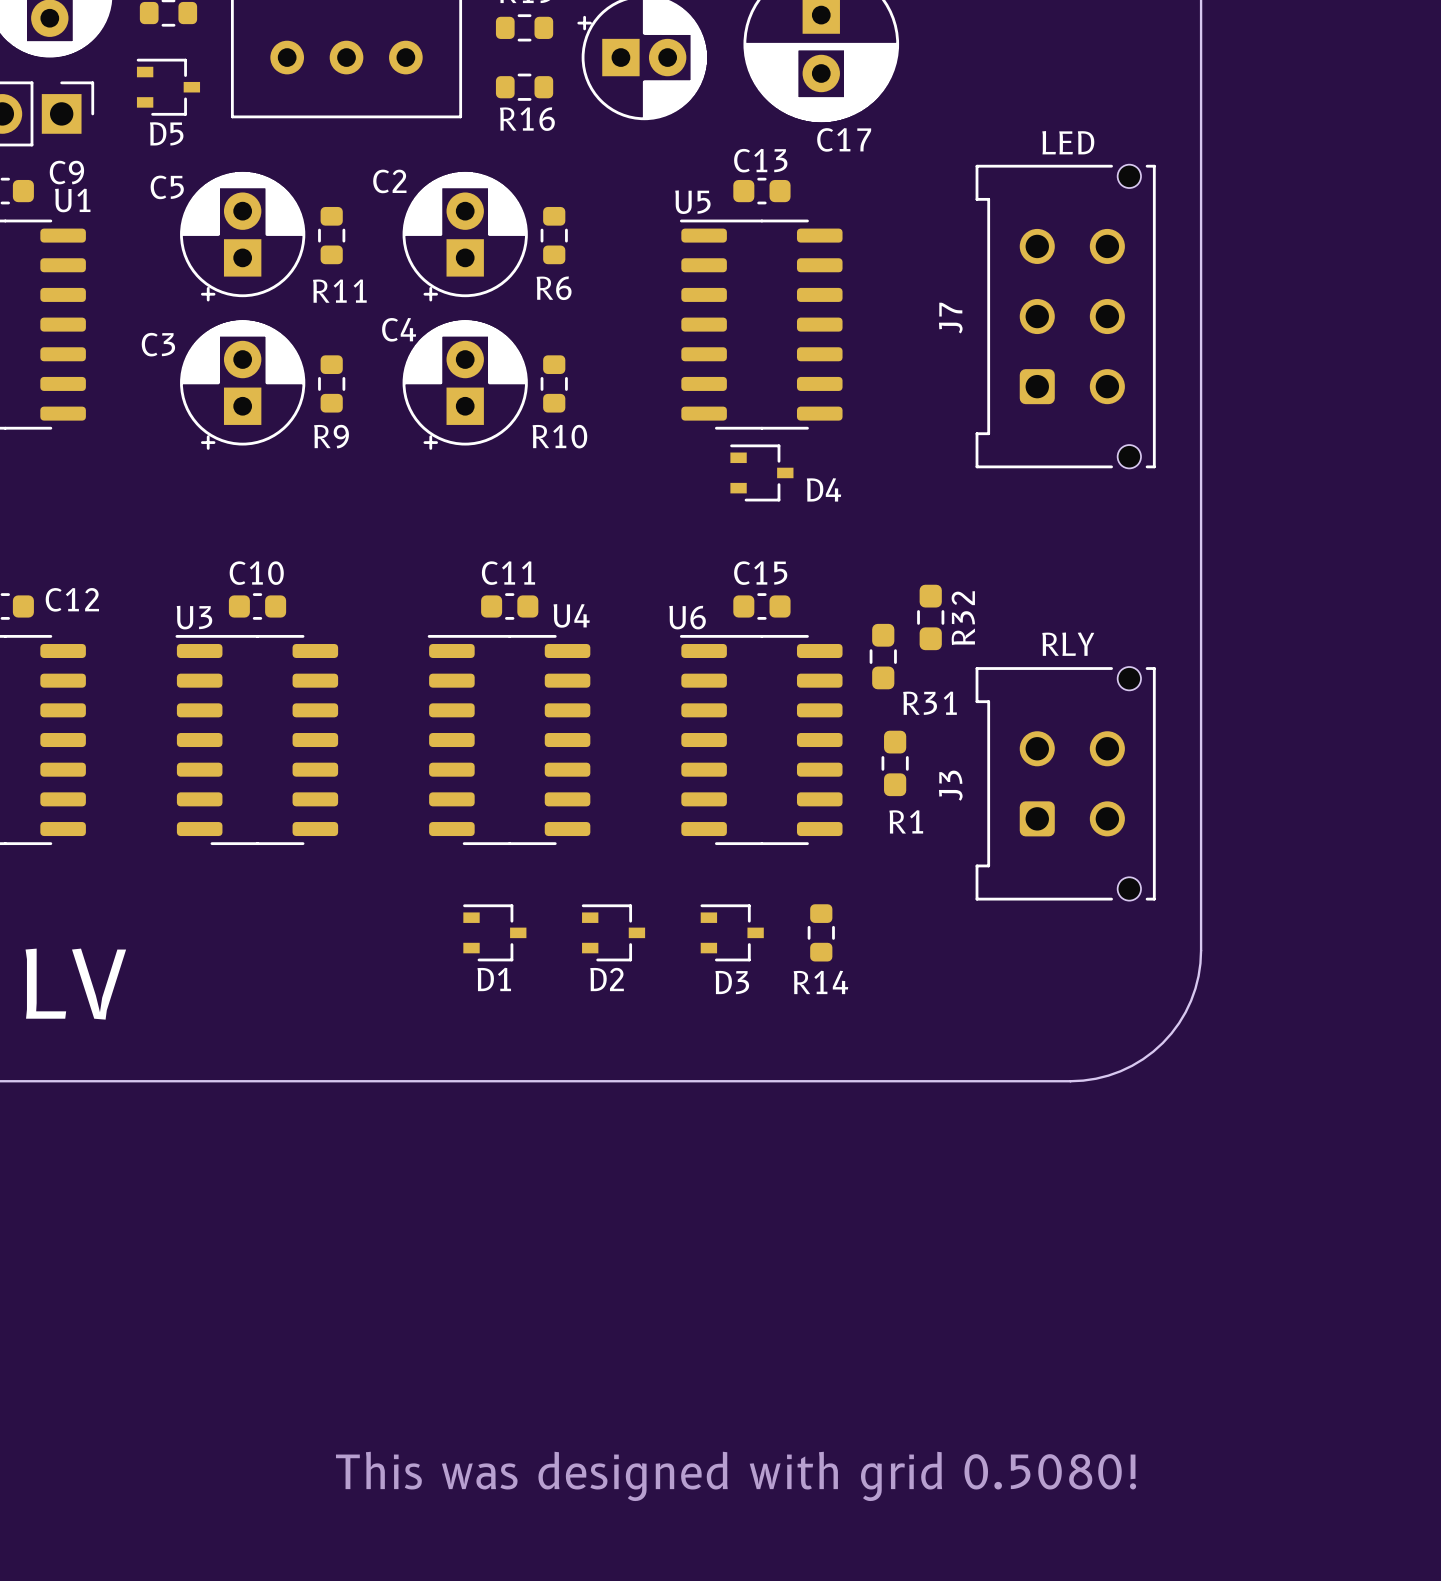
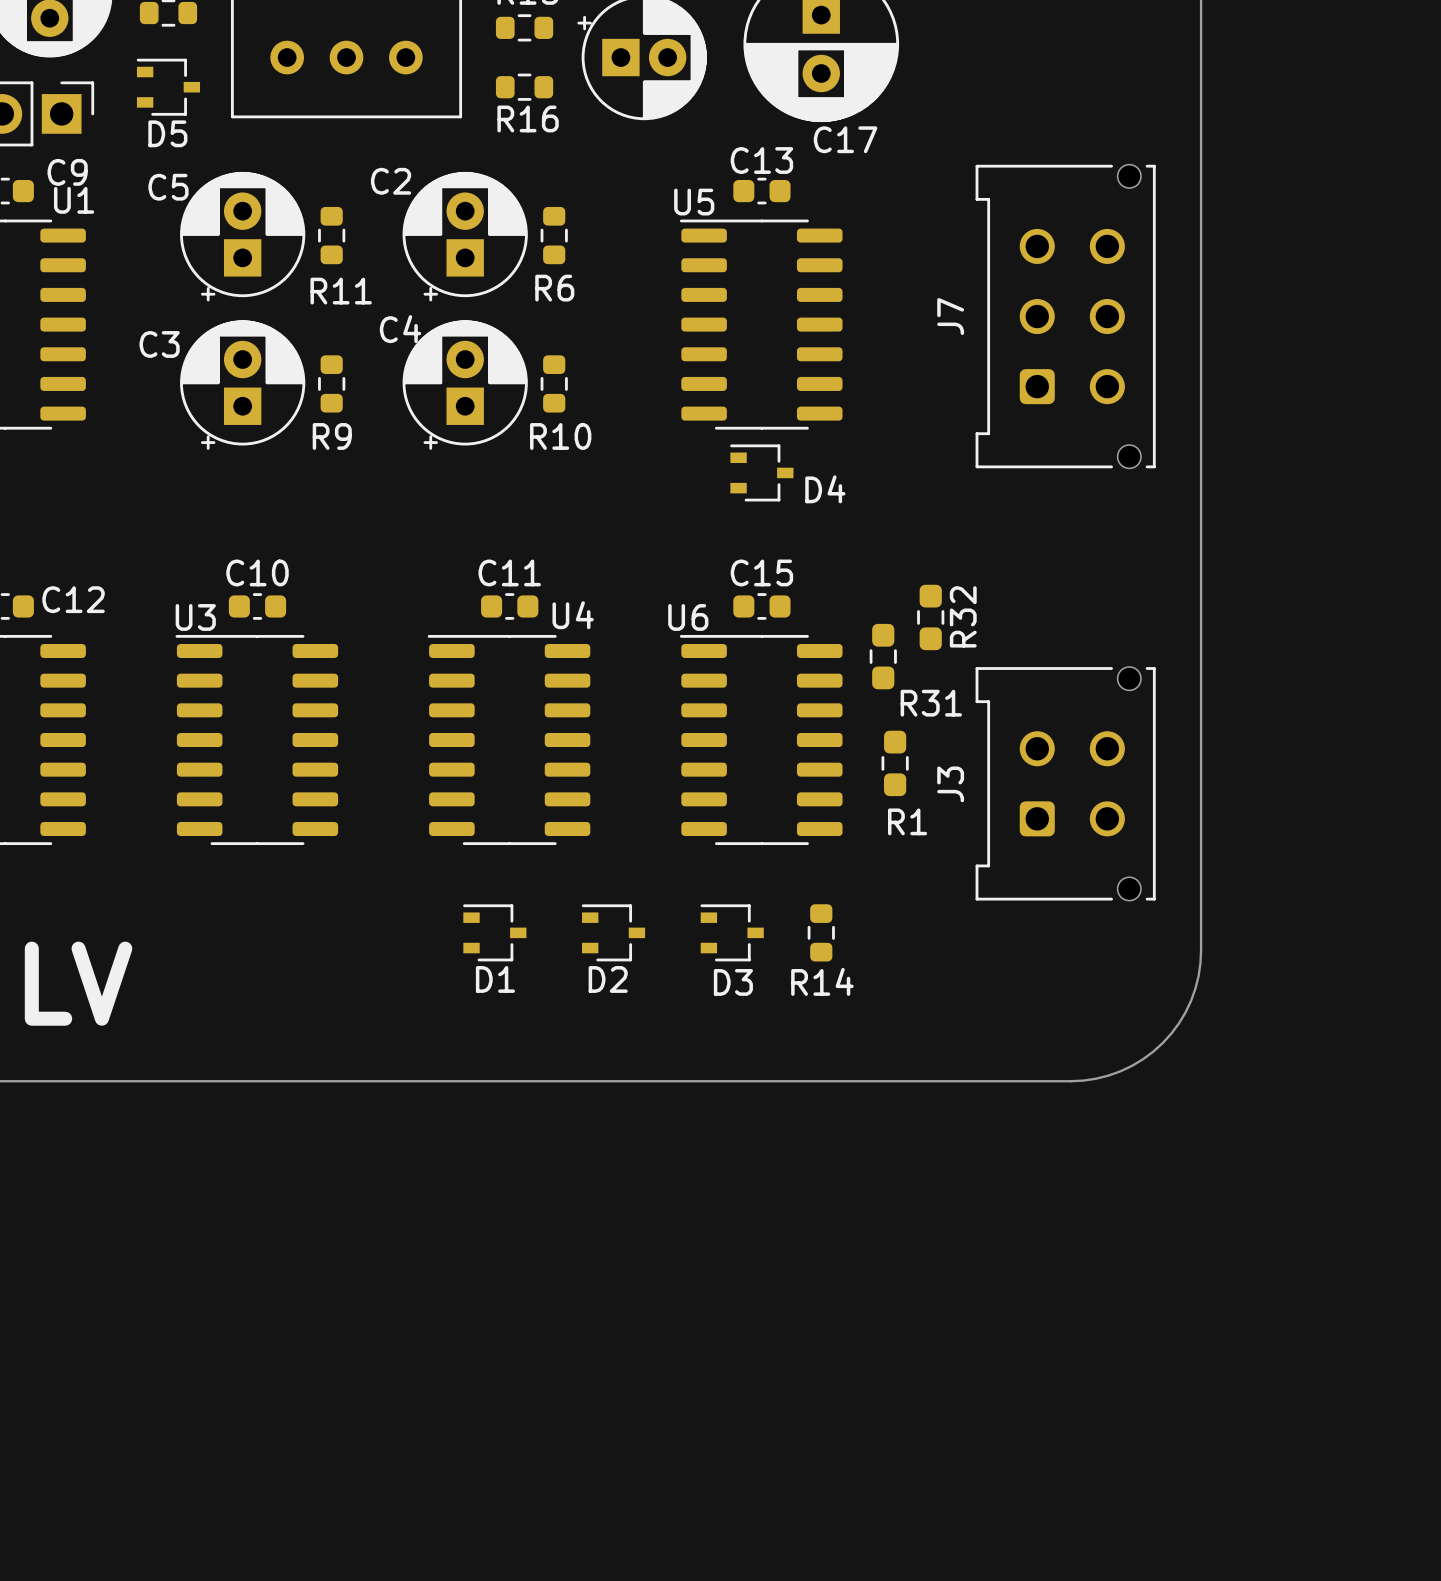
text: LED (1068, 142) -> none
text: RLY (1068, 644) -> none
text: This was designed with grid 0.5080! (736, 1476) -> none

